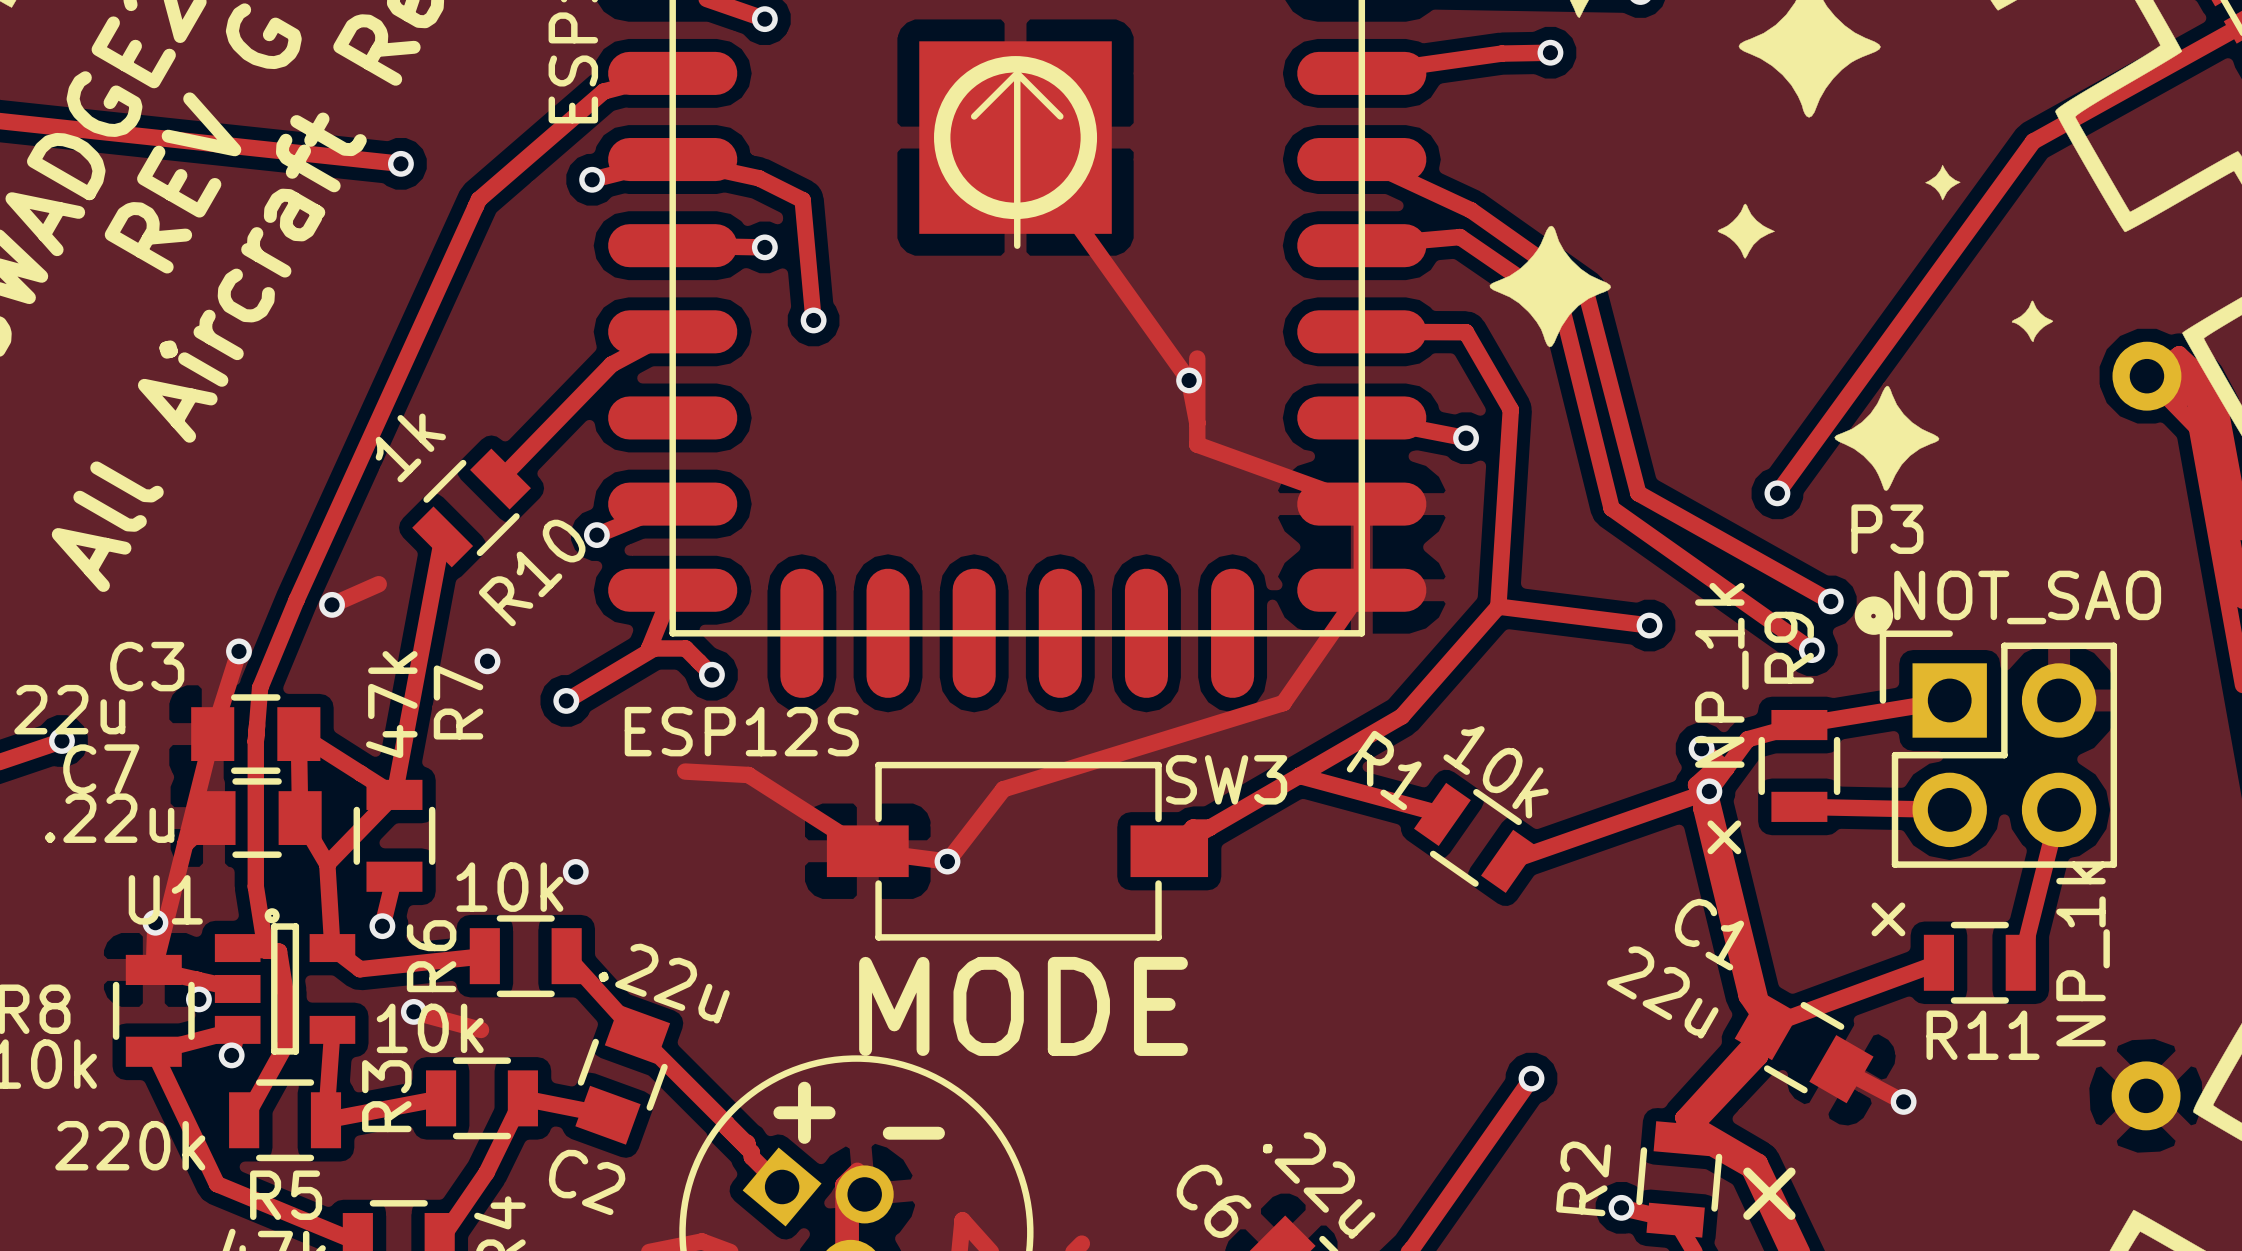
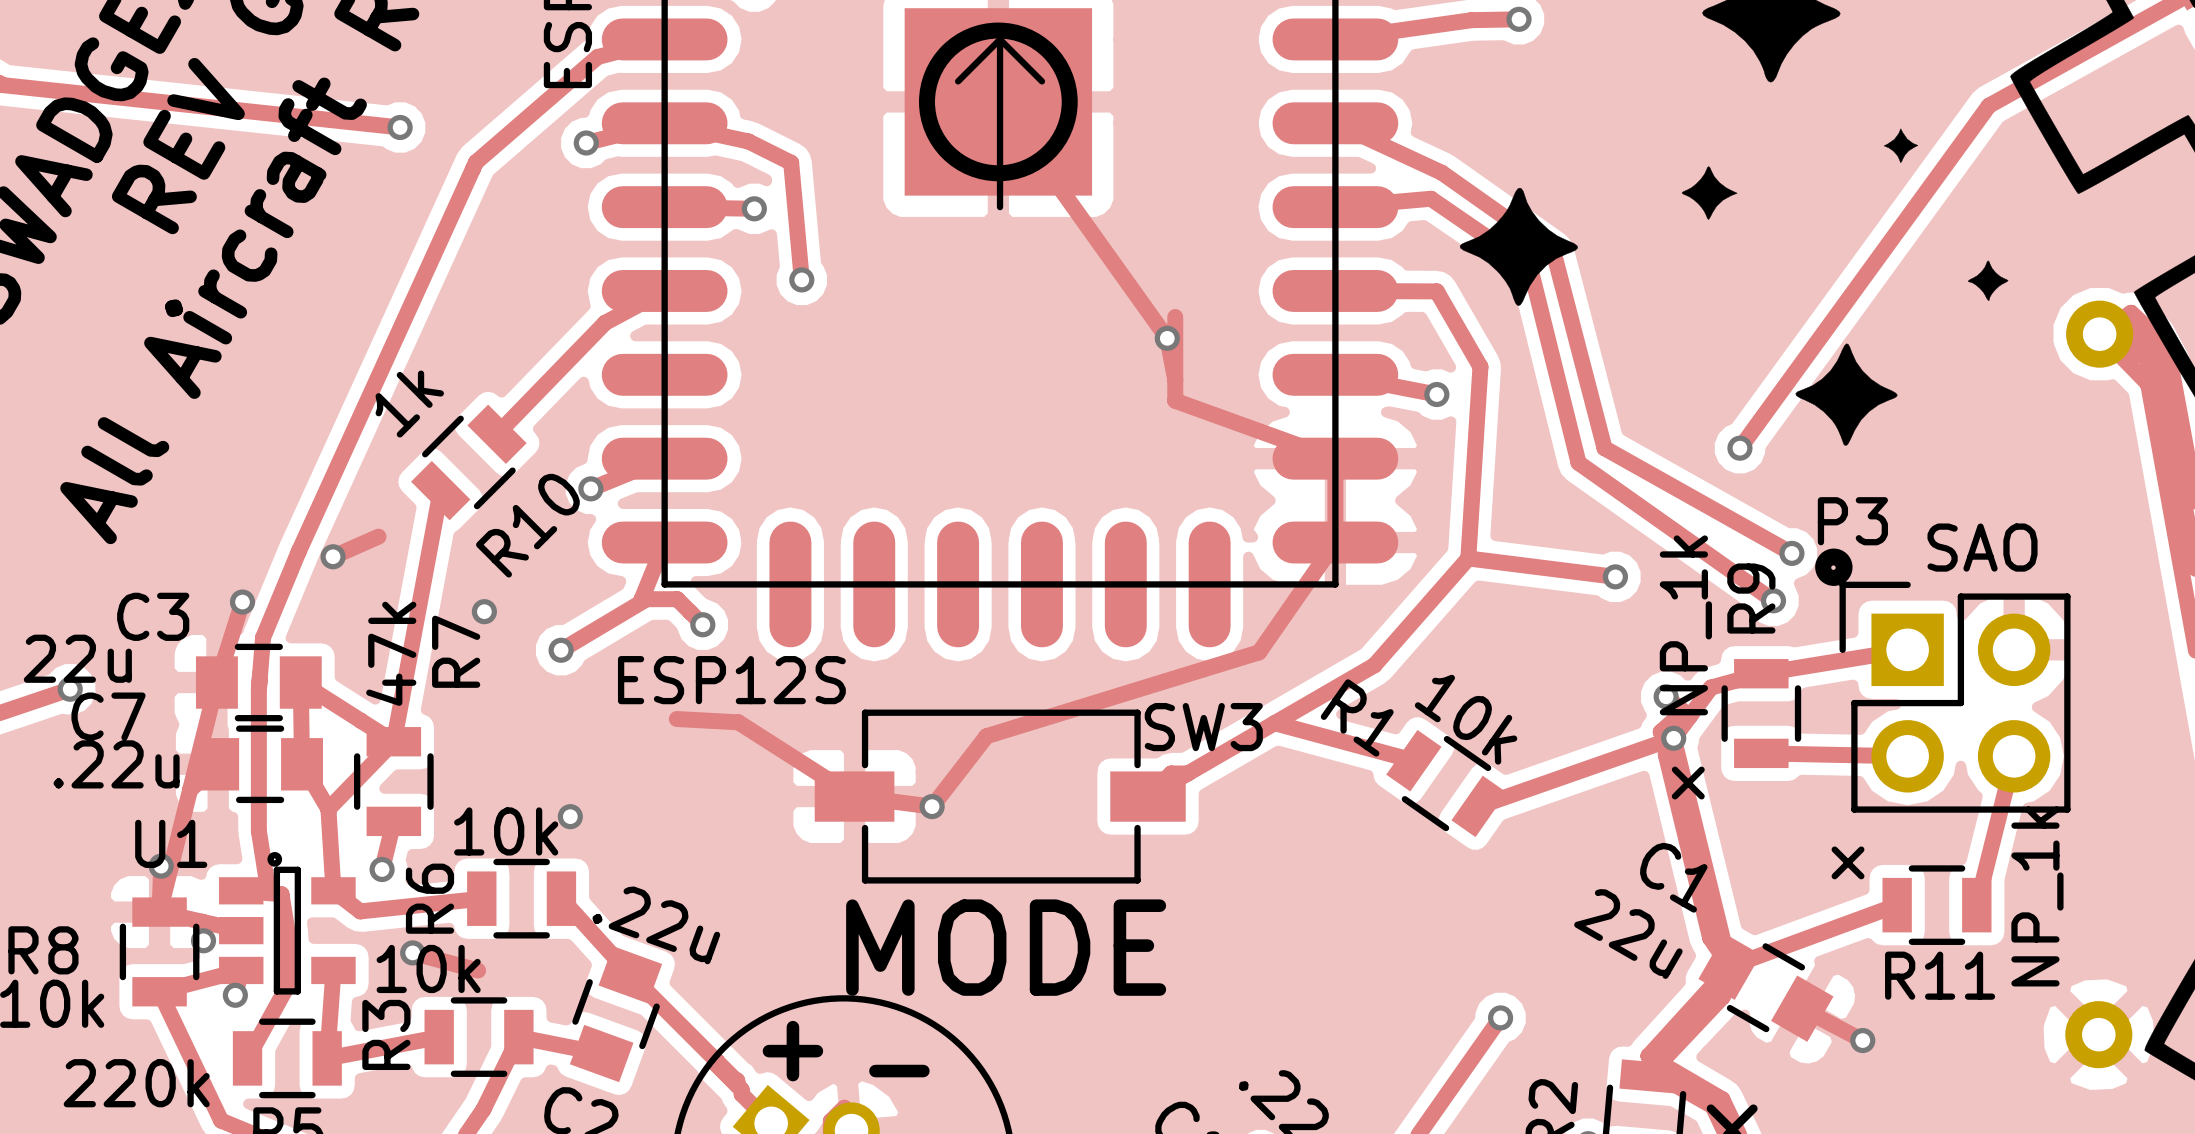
P3 name position: P3 (1887, 529) -> P3 (1852, 521)
P3 value: NOT_SAO (2027, 597) -> SAO (1982, 547)

